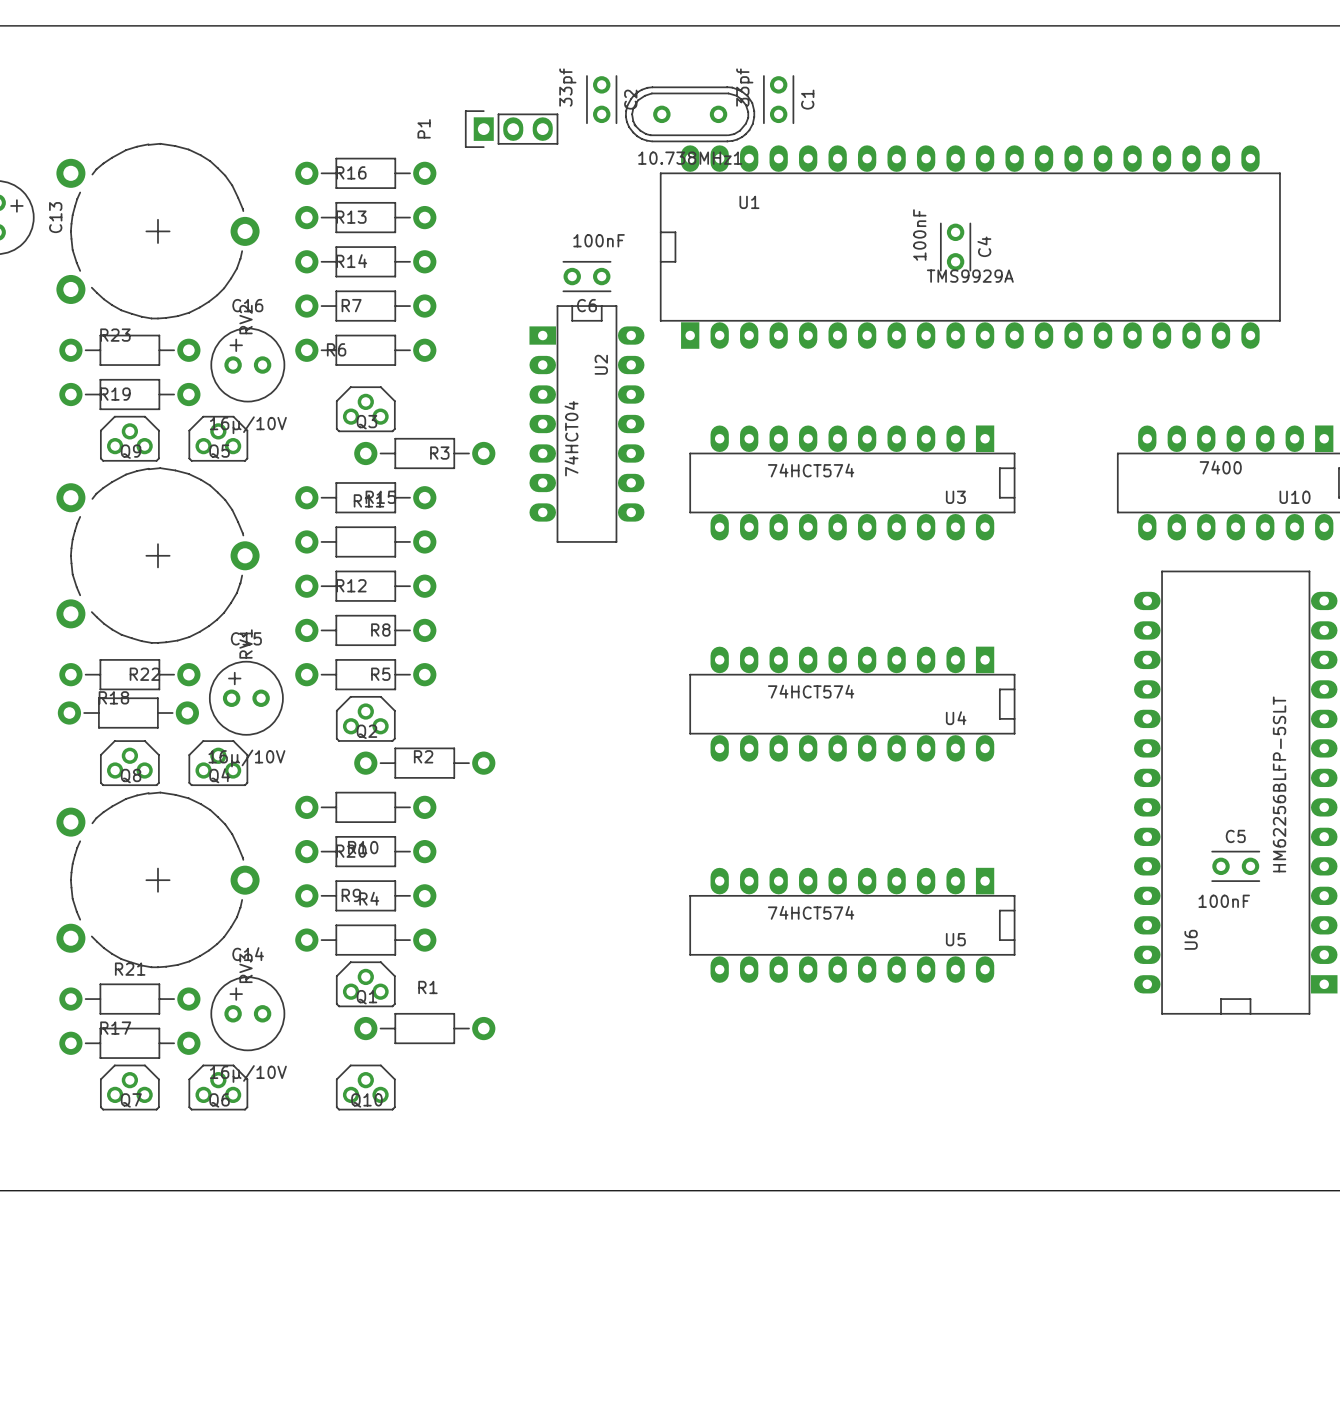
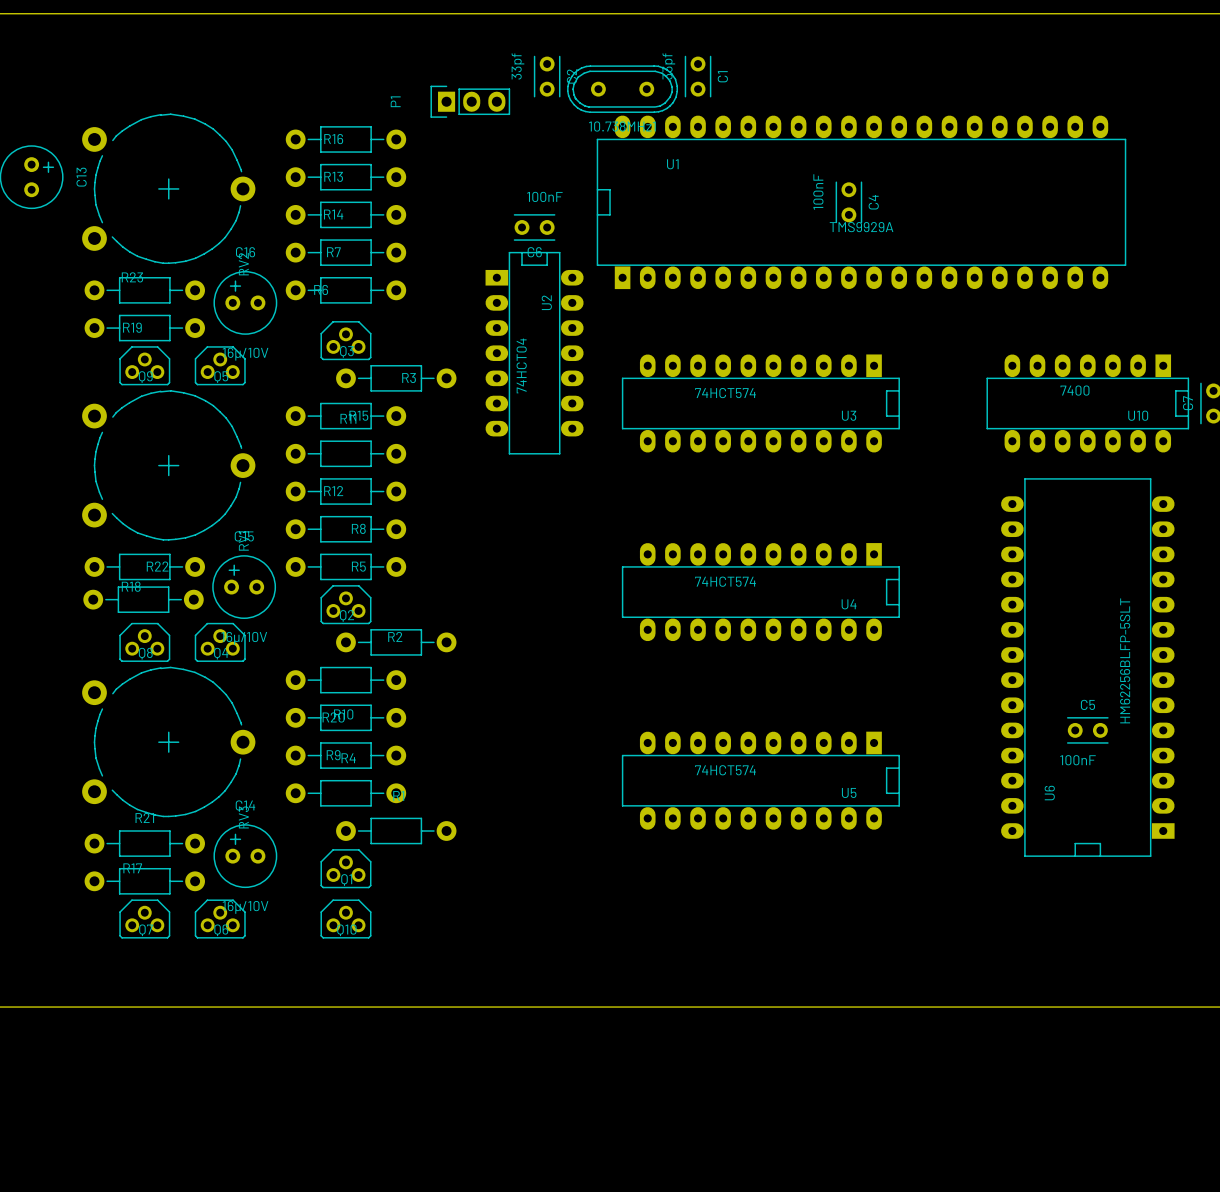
Q1 position: (365, 984) -> (345, 868)
R1 position: (424, 1028) -> (396, 831)

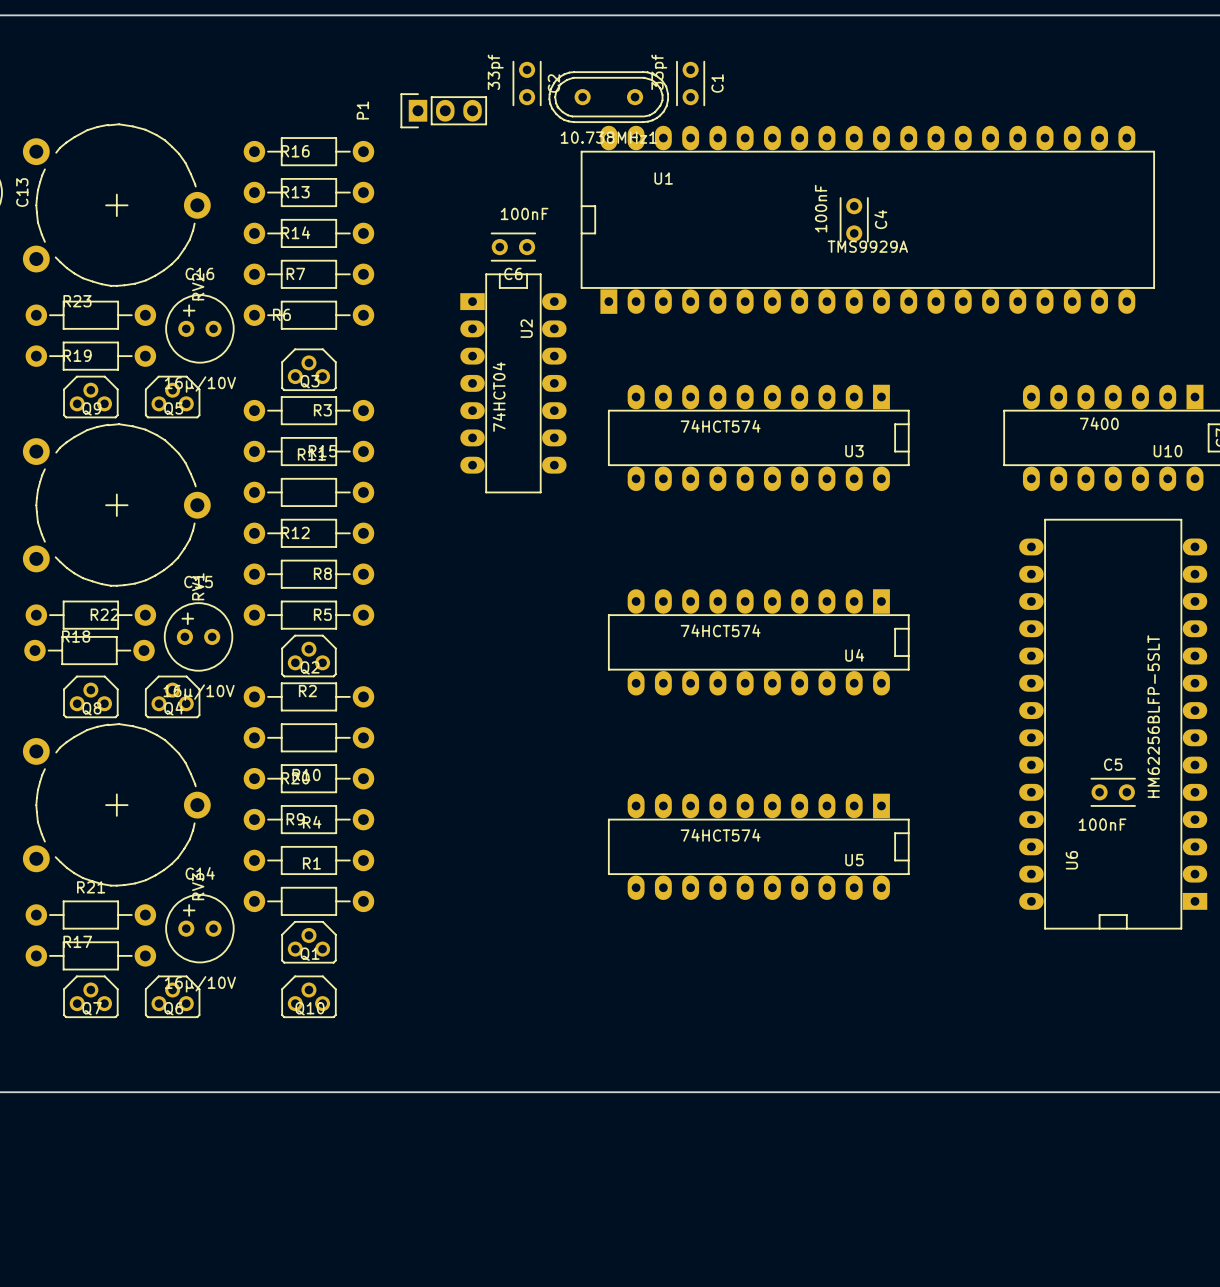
R3 position: (396, 378) -> (308, 410)
R2 position: (396, 642) -> (308, 696)
R1 position: (396, 831) -> (308, 901)

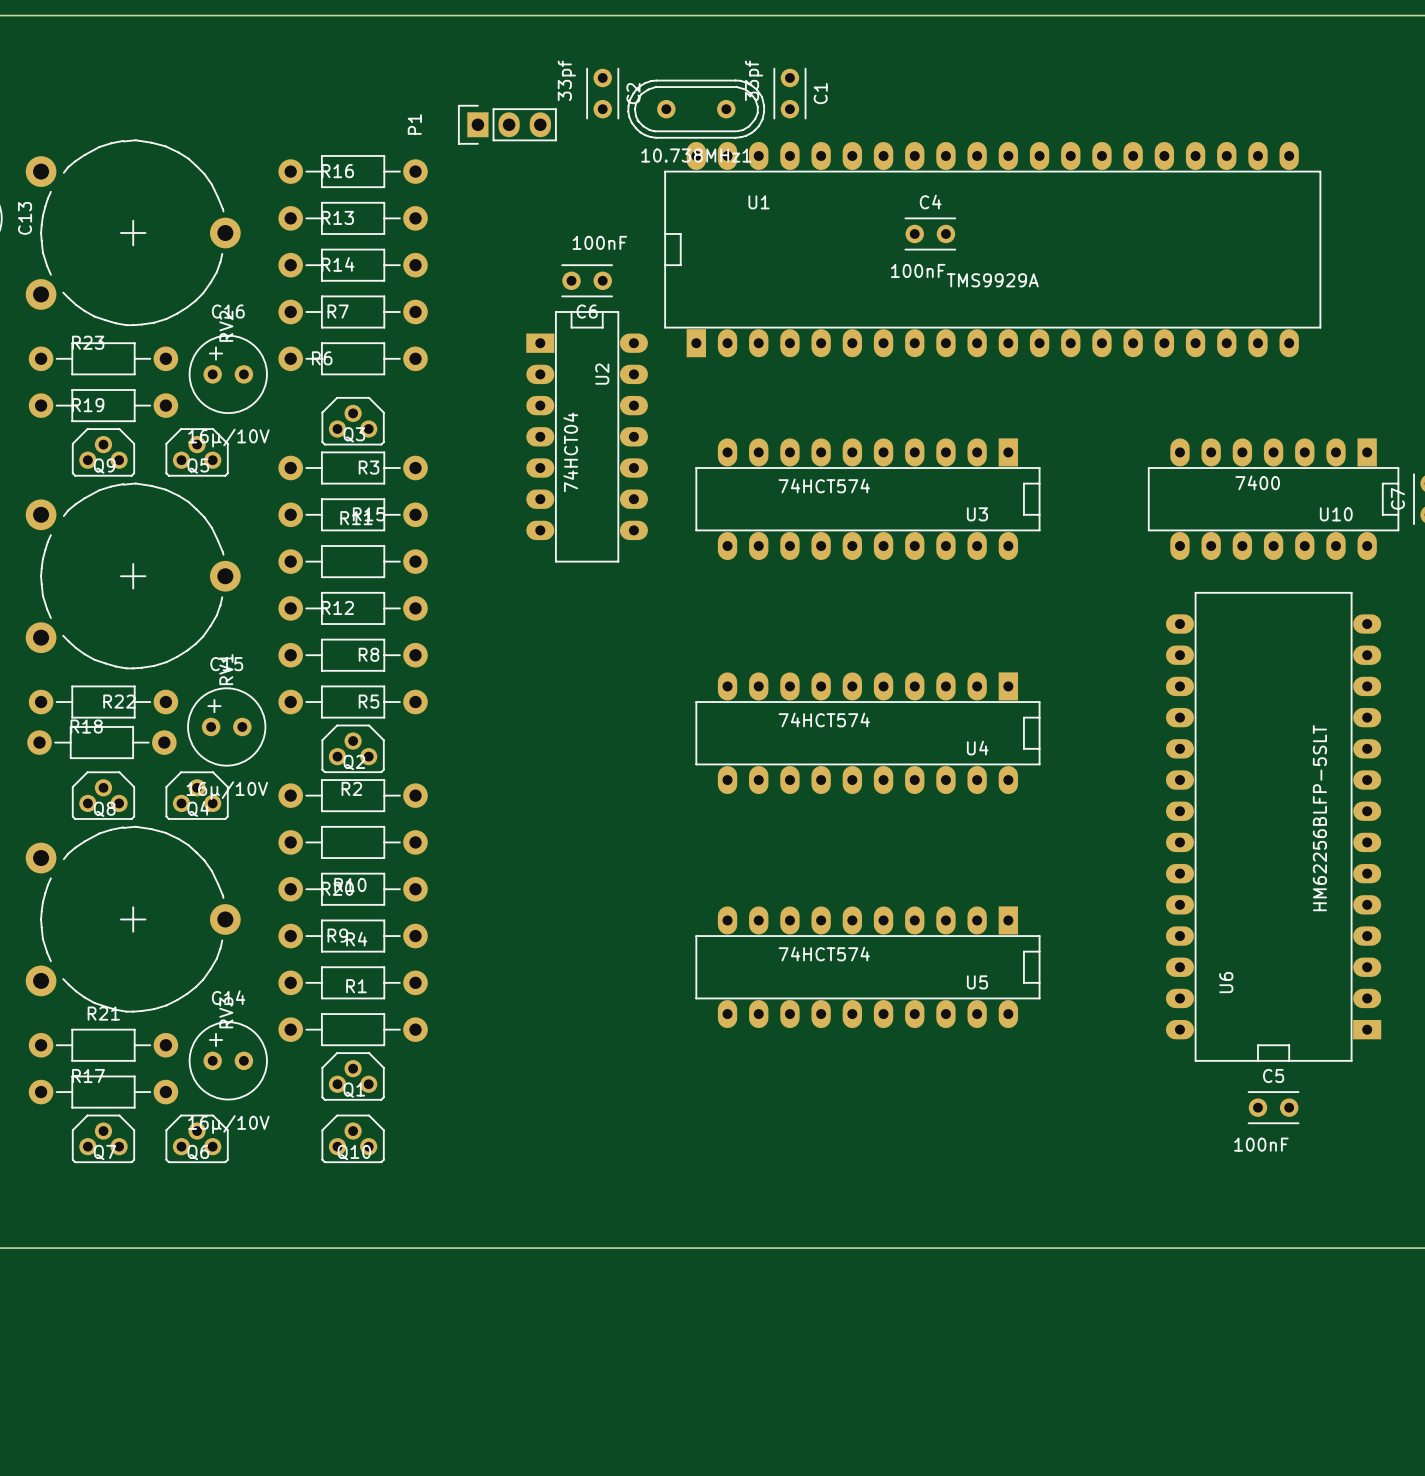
C4 value position: 100nF (821, 208) -> 100nF (918, 270)
C4 rotation: 0° (854, 219) -> 90° clockwise (930, 233)
C4 position: (854, 219) -> (930, 233)
C4 name position: C4 (880, 219) -> C4 (930, 202)
C5 position: (1113, 792) -> (1273, 1107)

